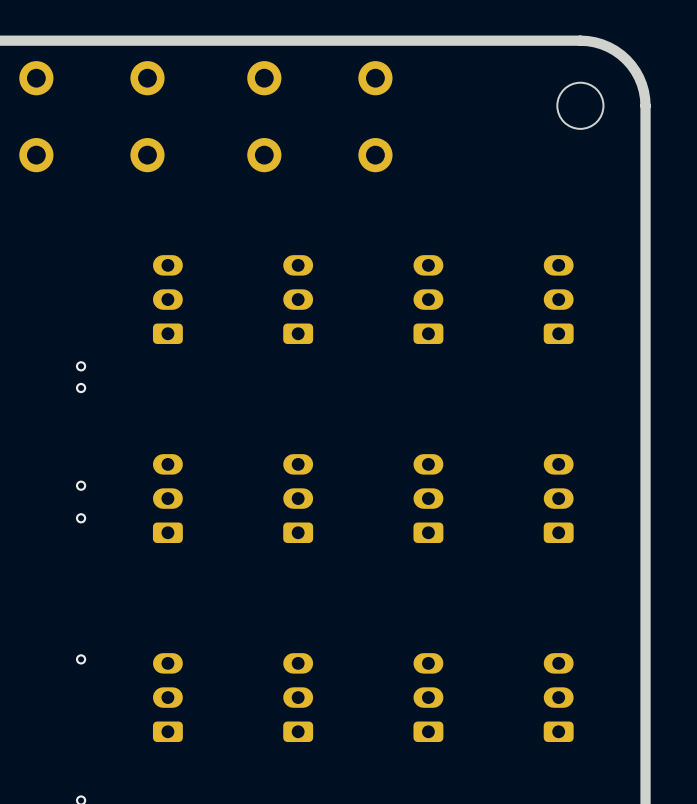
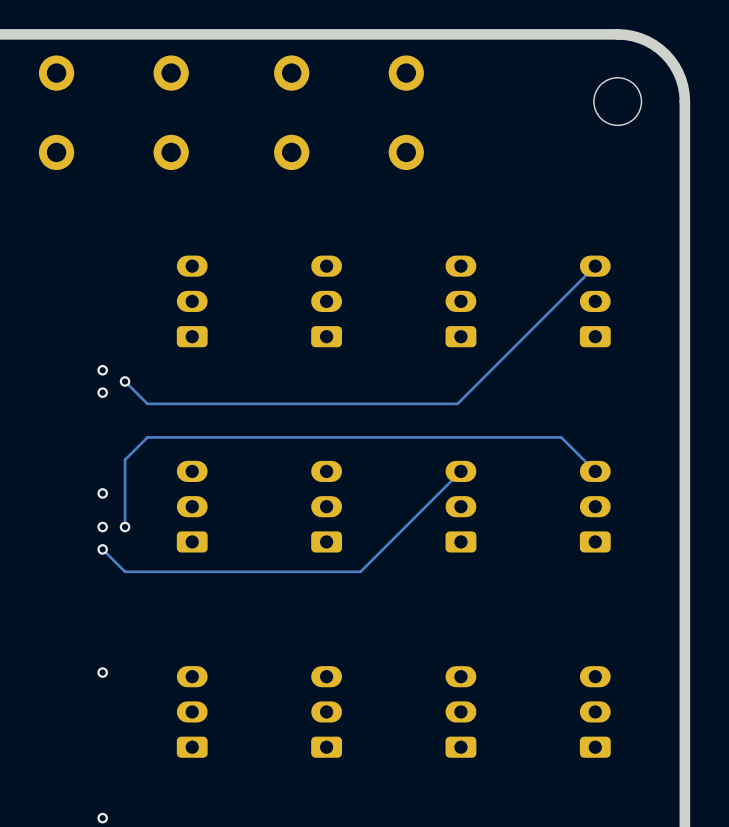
track: none -> (595, 266) (457, 403) (147, 403) (125, 381)
via: none -> (125, 381)
track: none -> (460, 471) (360, 571) (125, 571) (102, 549)
track: none -> (595, 471) (561, 437) (147, 437) (125, 459) (125, 527)
via: none -> (125, 527)
via: none -> (102, 549)

